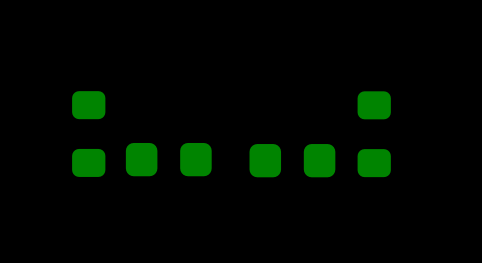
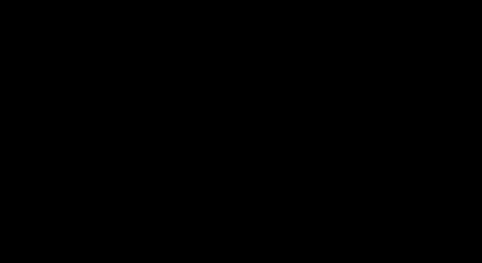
part: (88, 134) -> none
part: (374, 134) -> none
part: (168, 159) -> none
part: (292, 160) -> none

